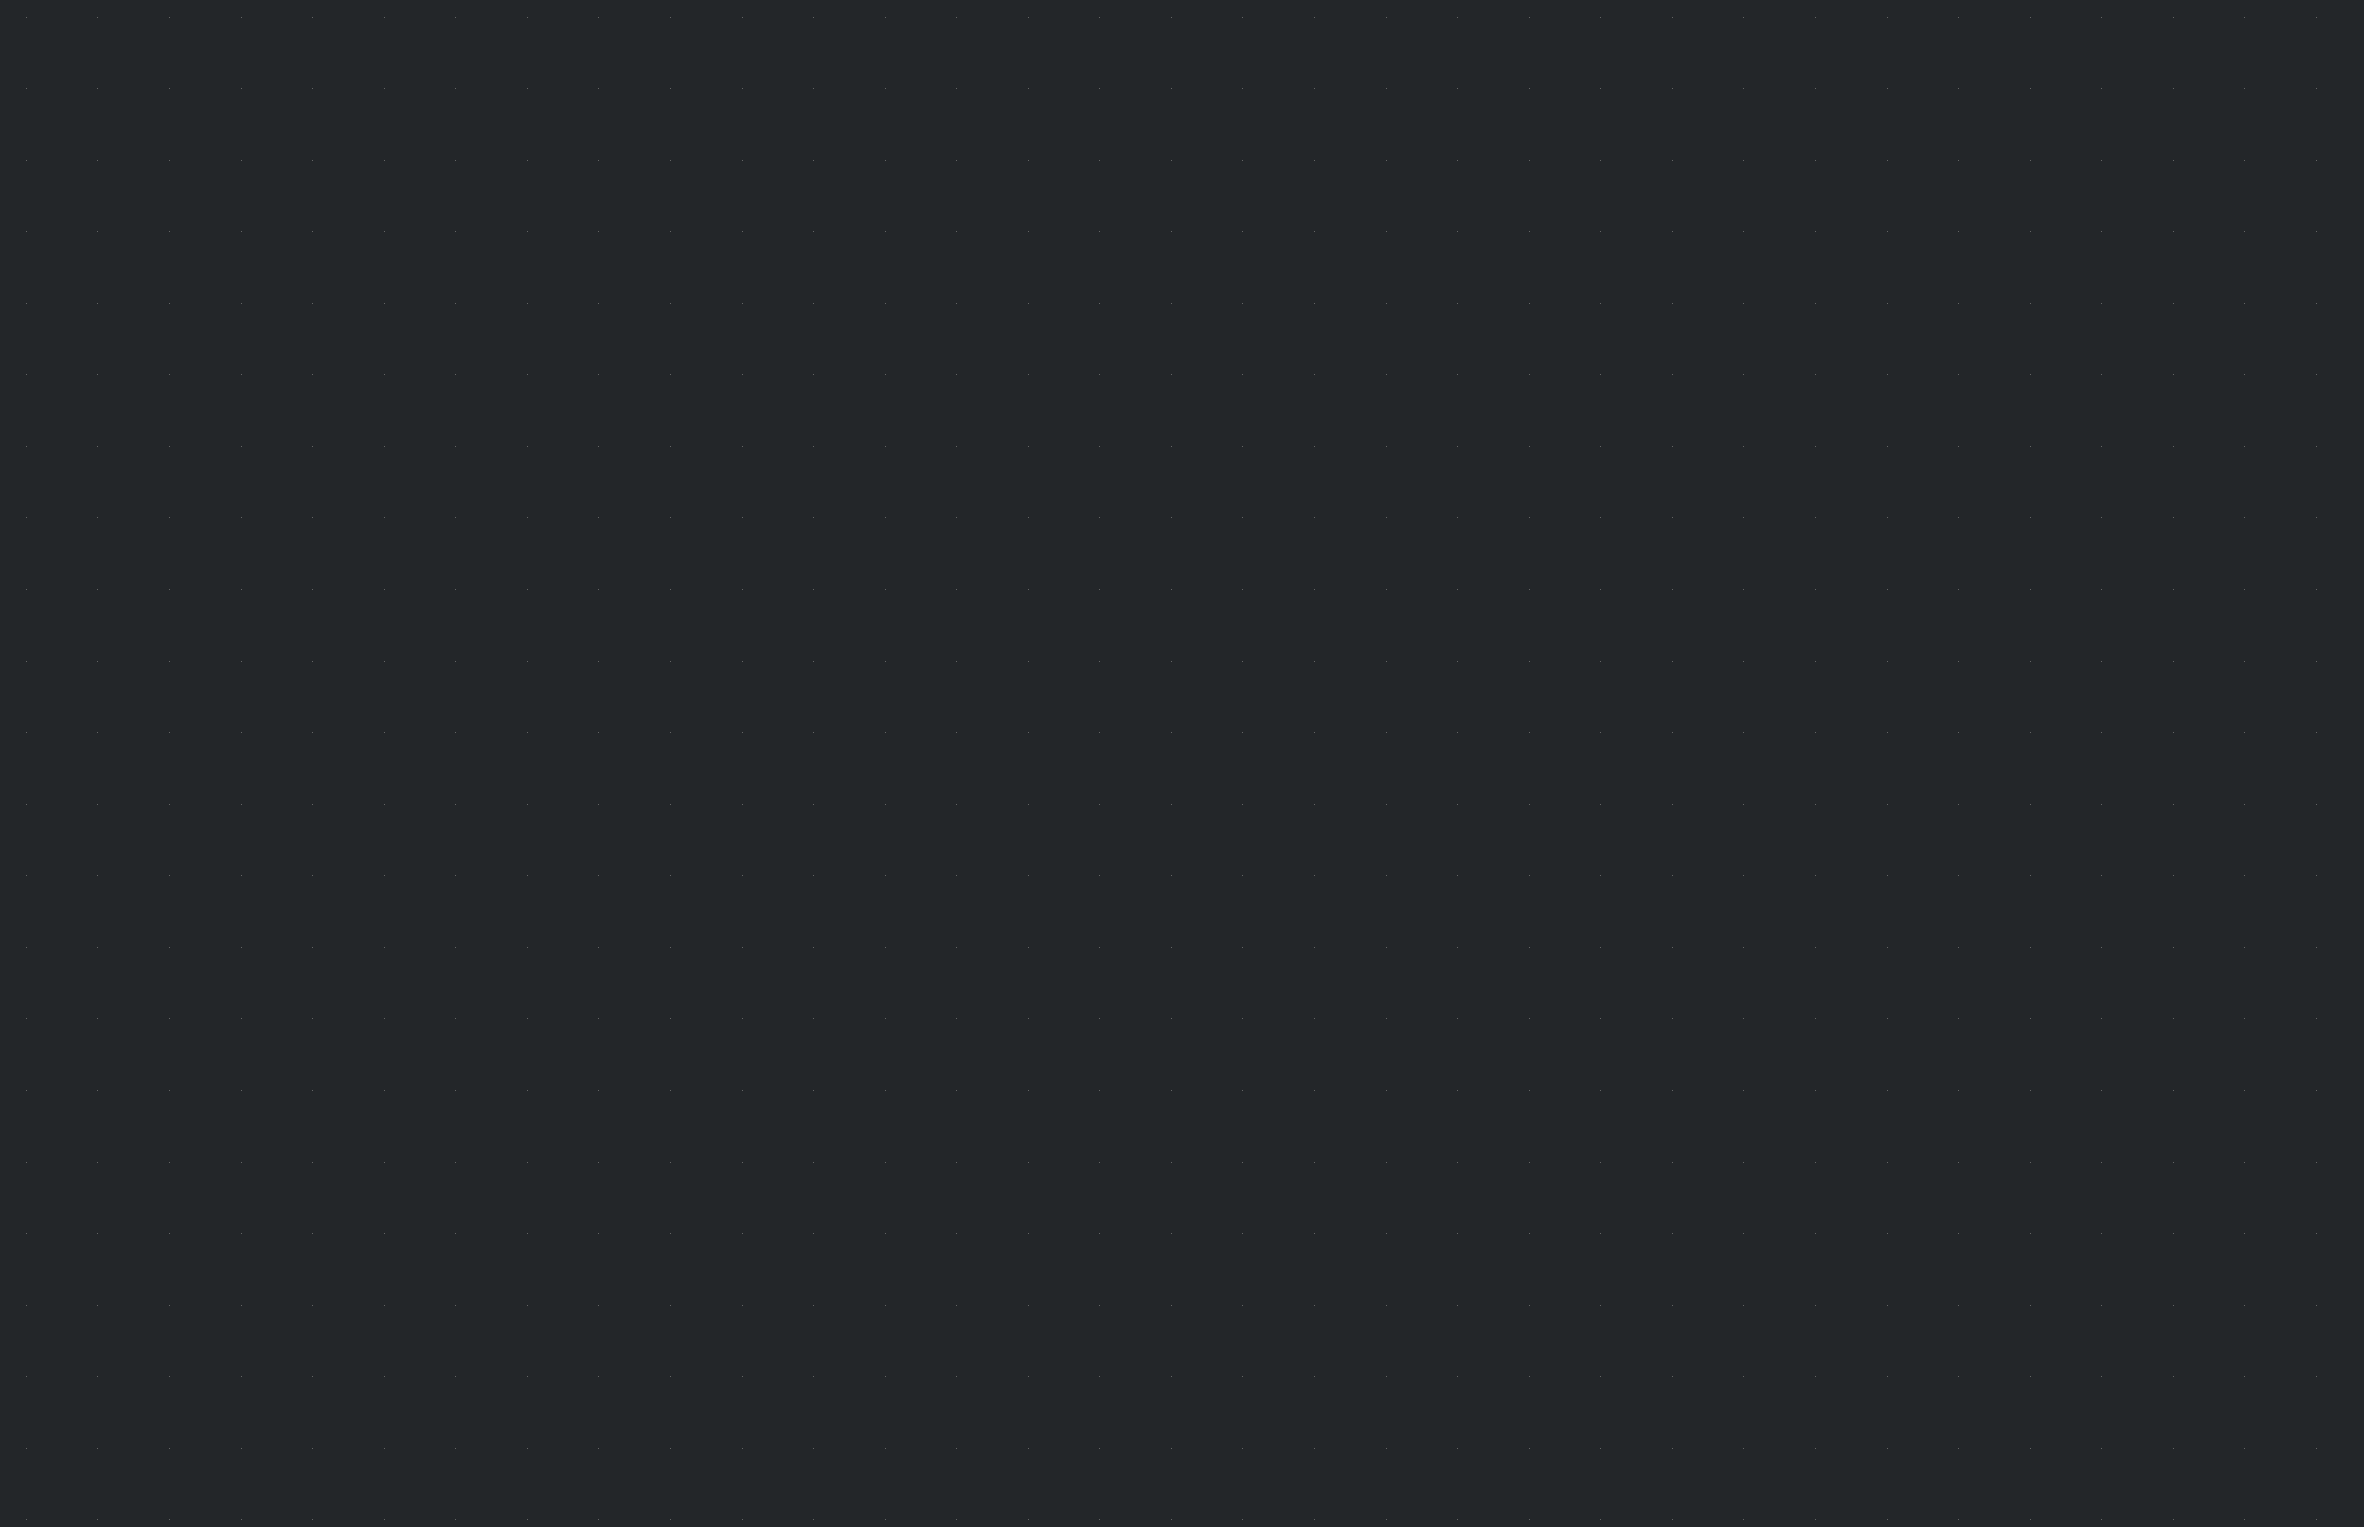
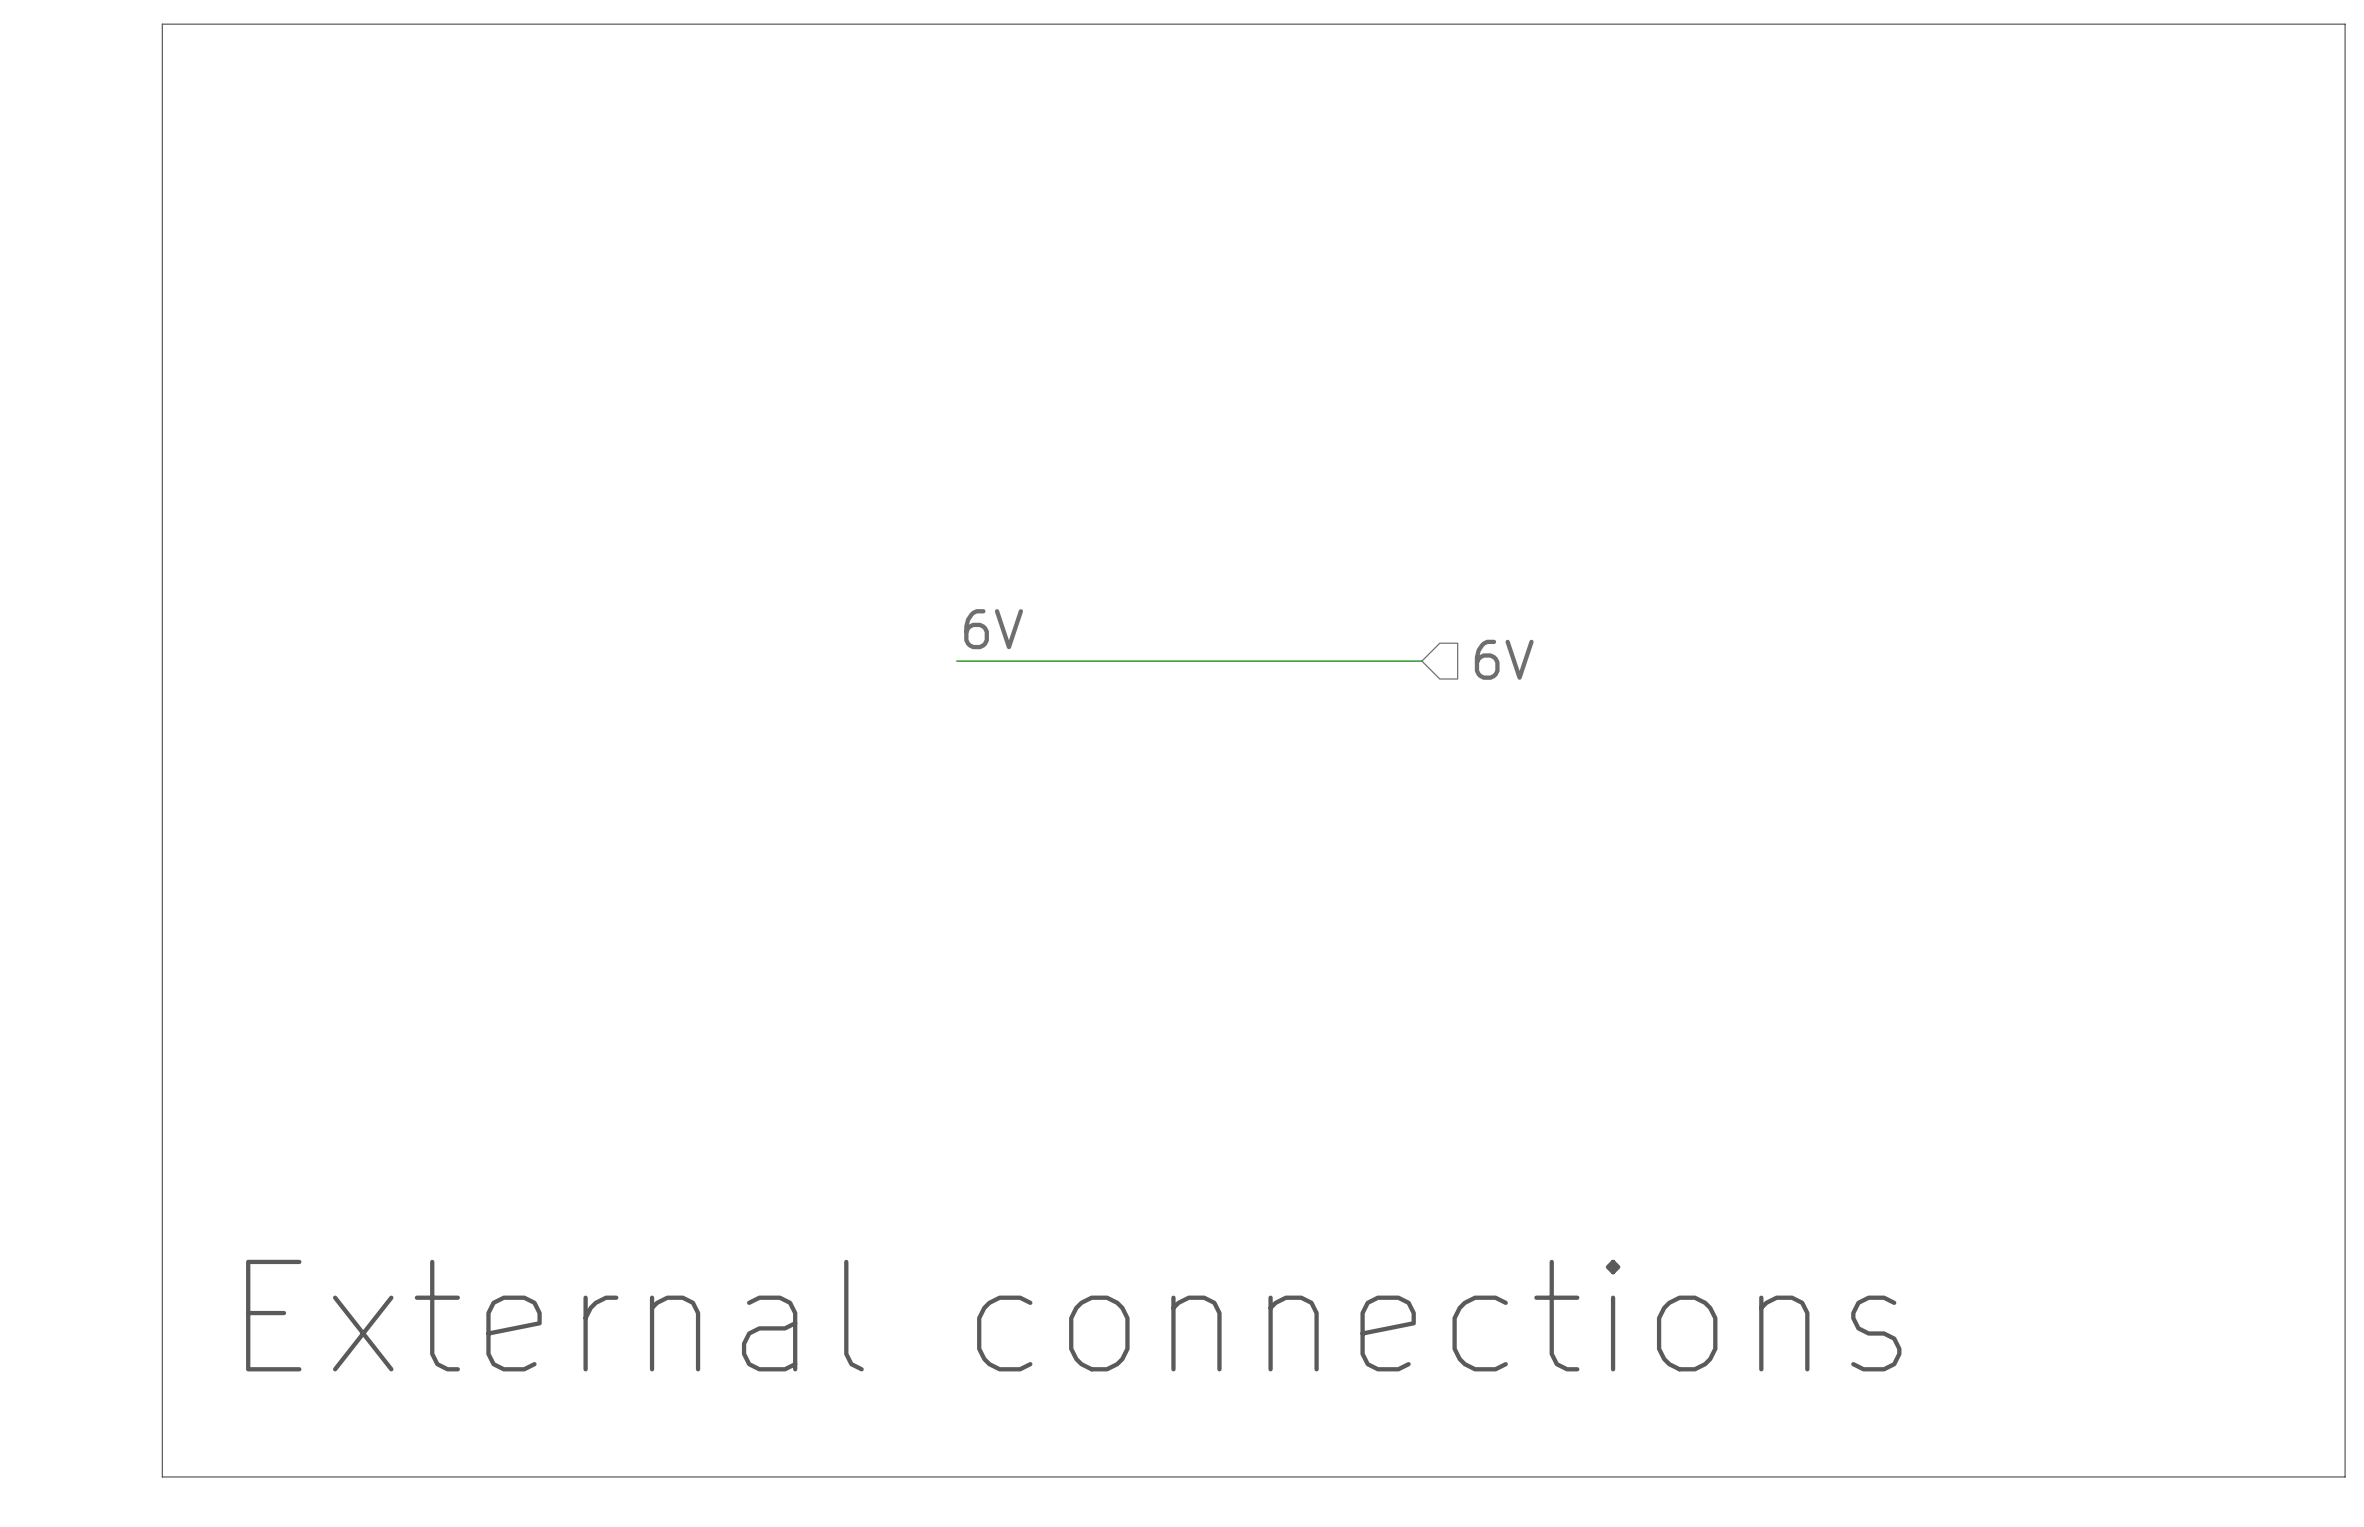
line: none -> (162, 24) (2345, 24) (2345, 1476) (162, 1476) (162, 24)
label: none -> 6V (993, 629)
hierarchical label: none -> 6V (1504, 659)
wire: none -> (956, 661) (1421, 661)
text: none -> External connections (1073, 1315)

